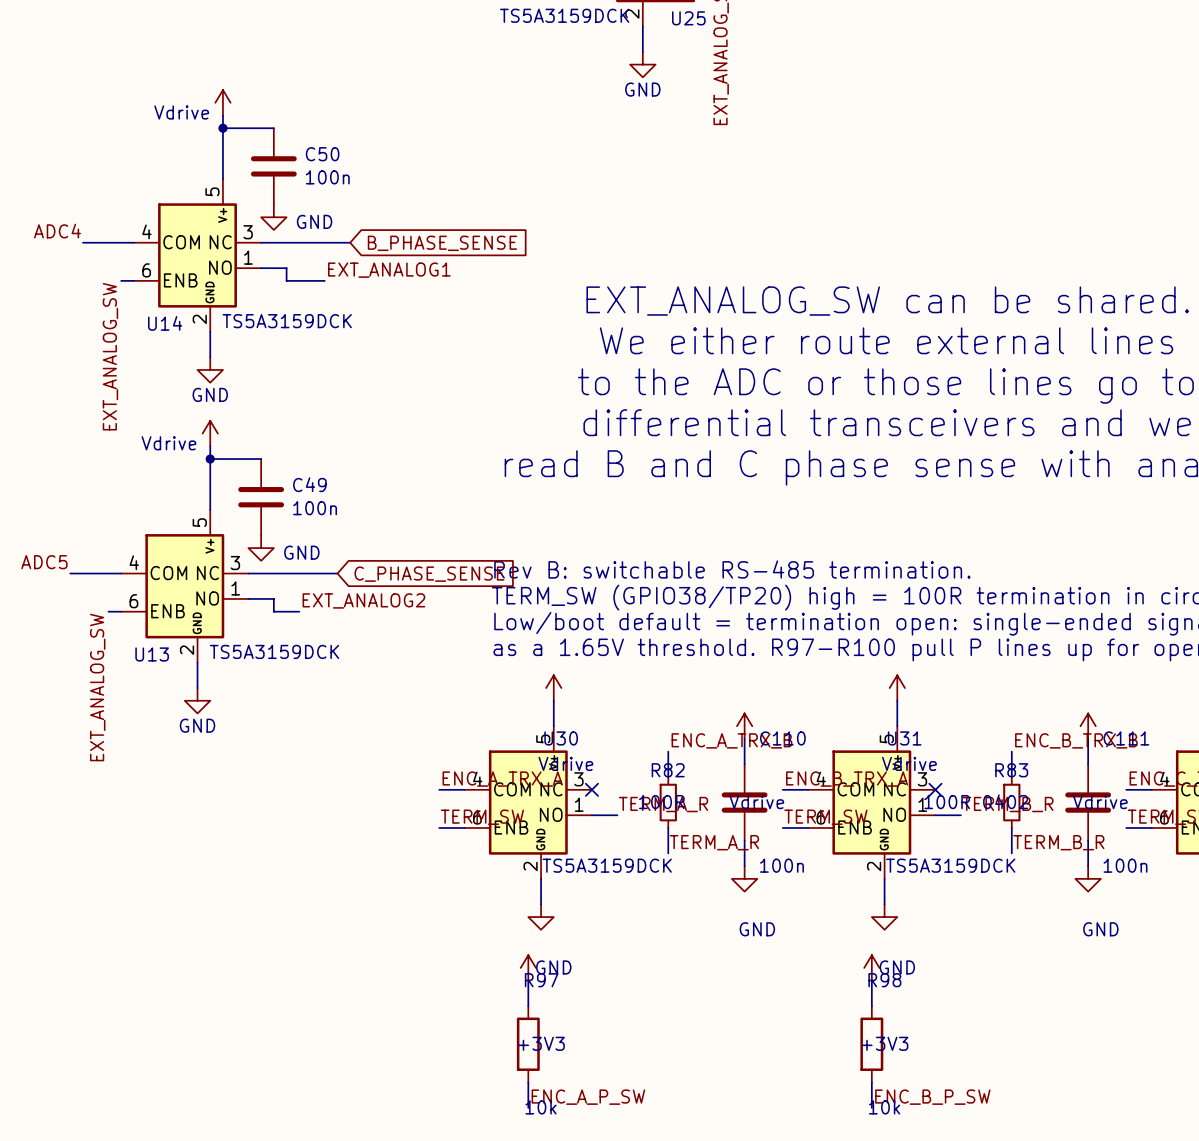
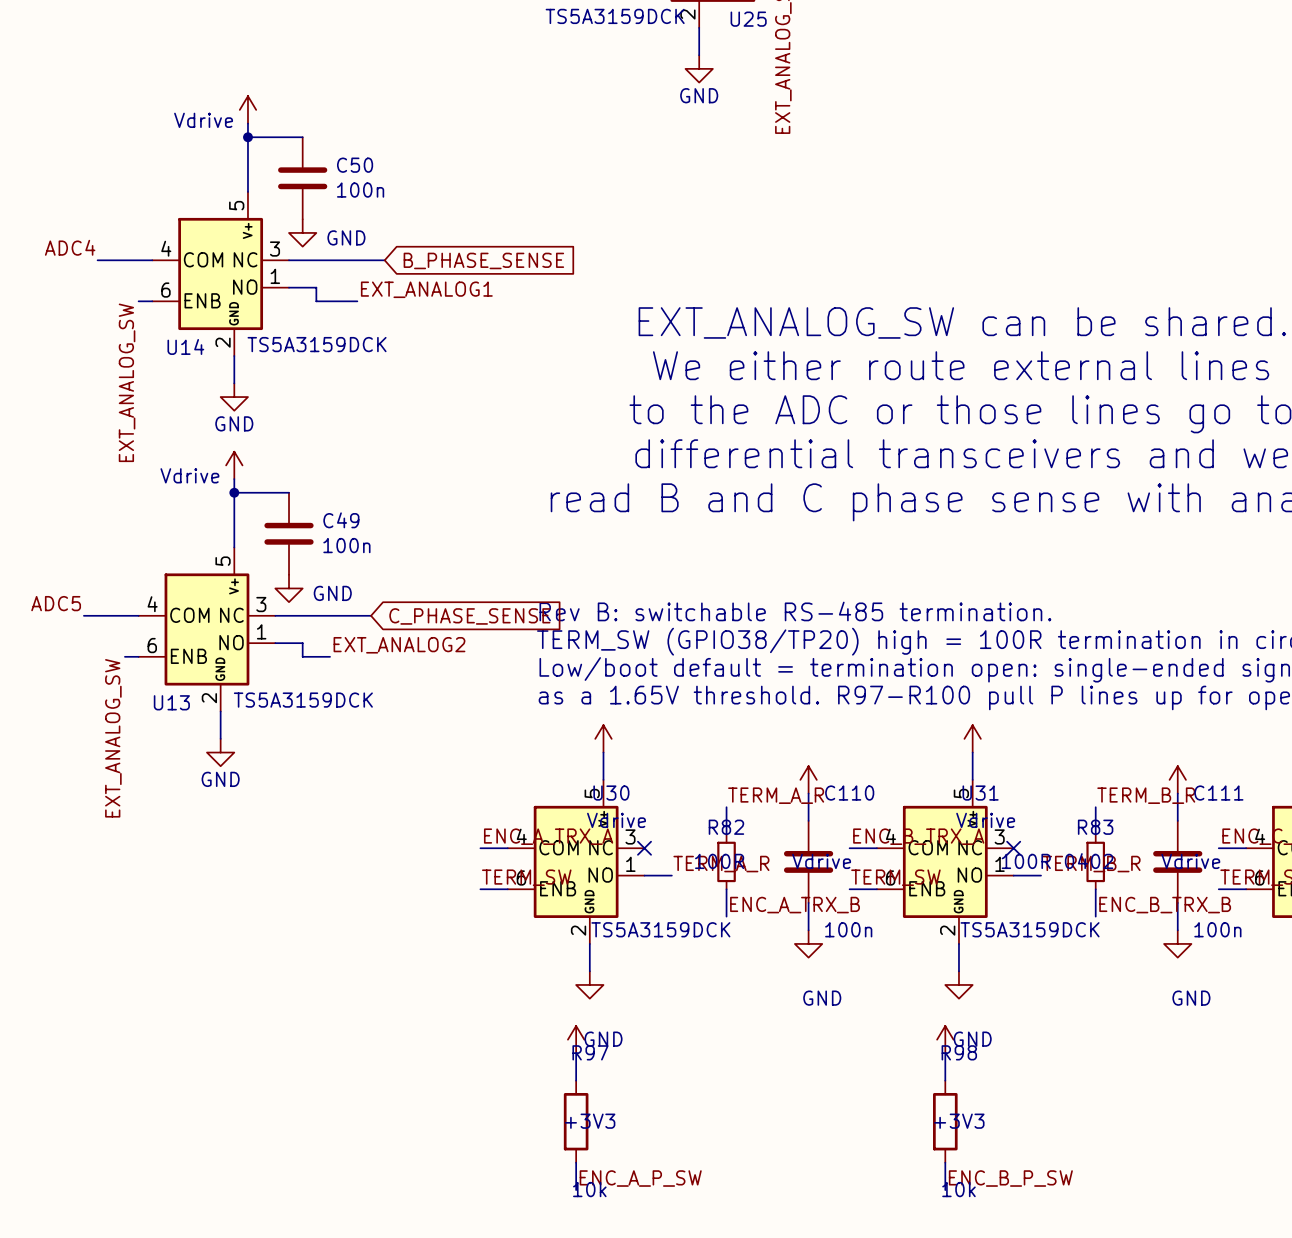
label: ENC_A_TRX_B (731, 740) -> TERM_A_R (776, 795)
label: ENC_B_TRX_B (1076, 740) -> TERM_B_R (1146, 795)
label: TERM_A_R (714, 842) -> ENC_A_TRX_B (795, 905)
label: TERM_B_R (1058, 842) -> ENC_B_TRX_B (1165, 905)

